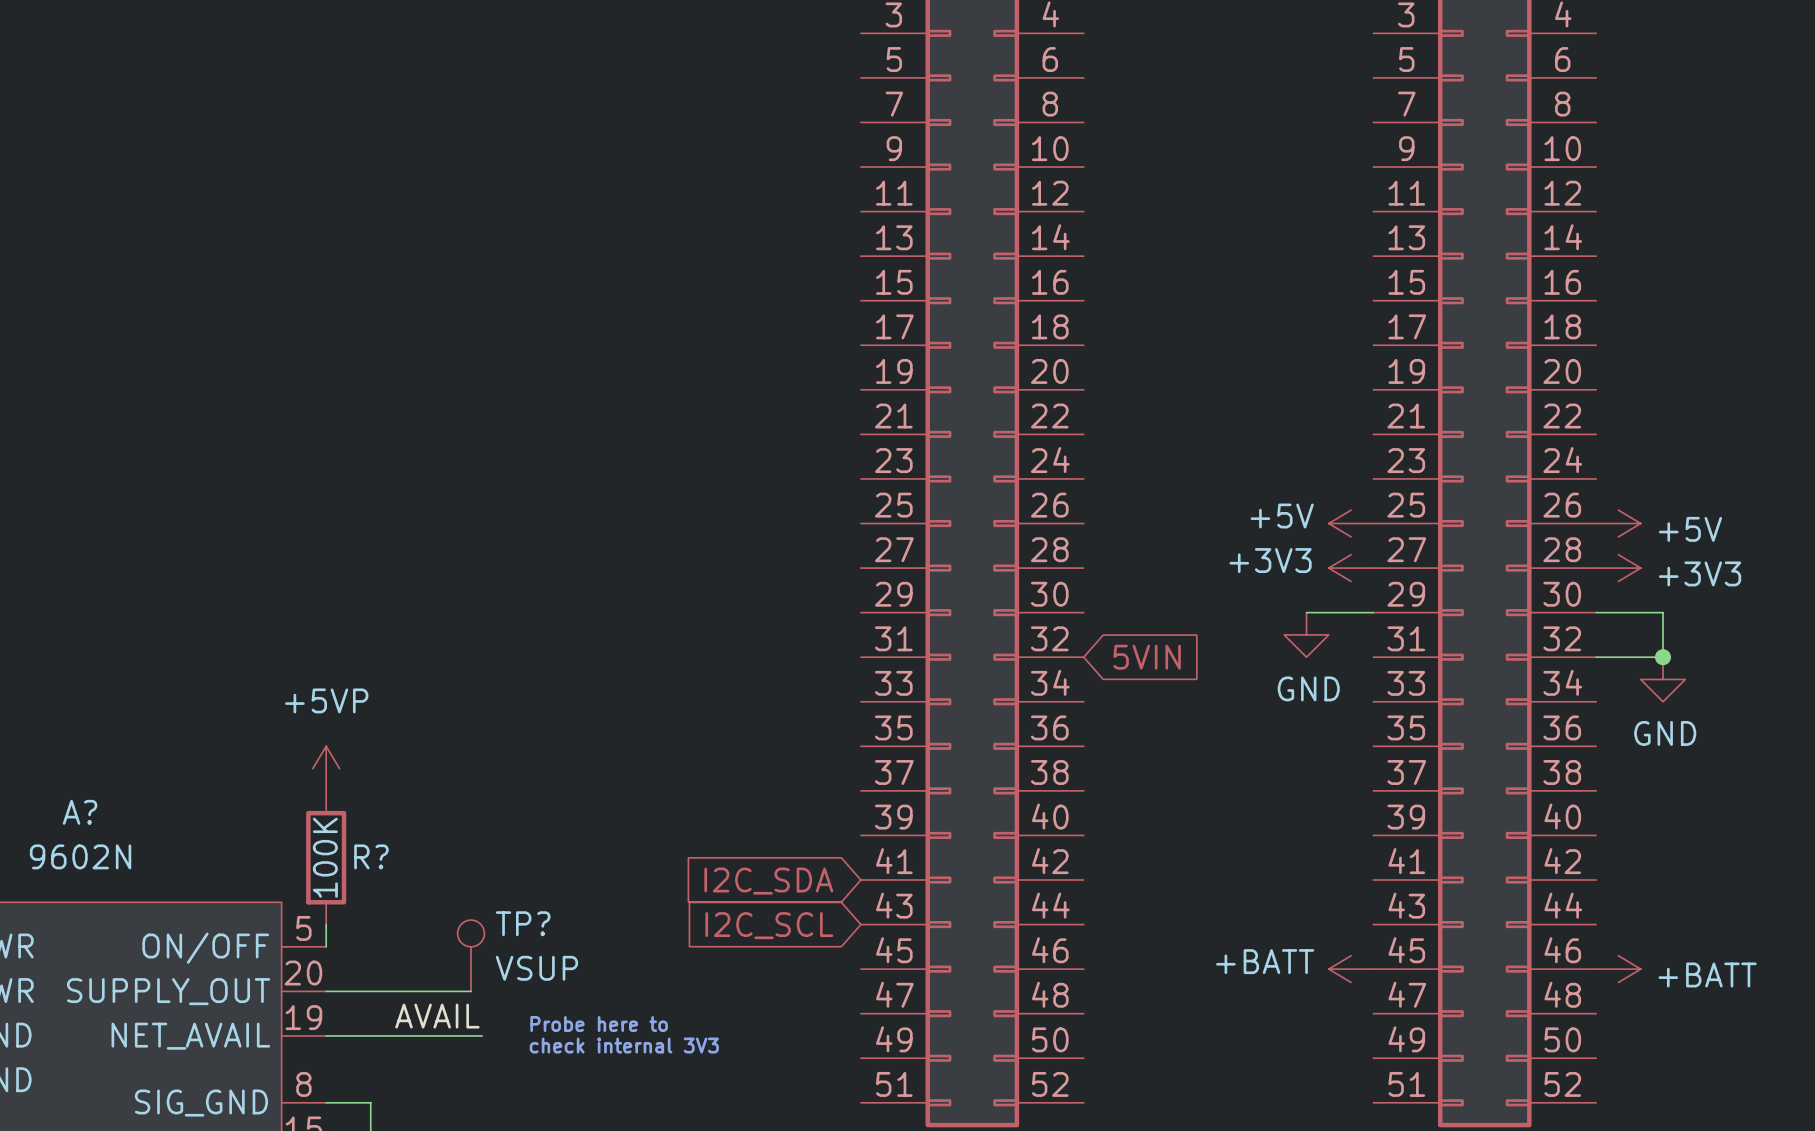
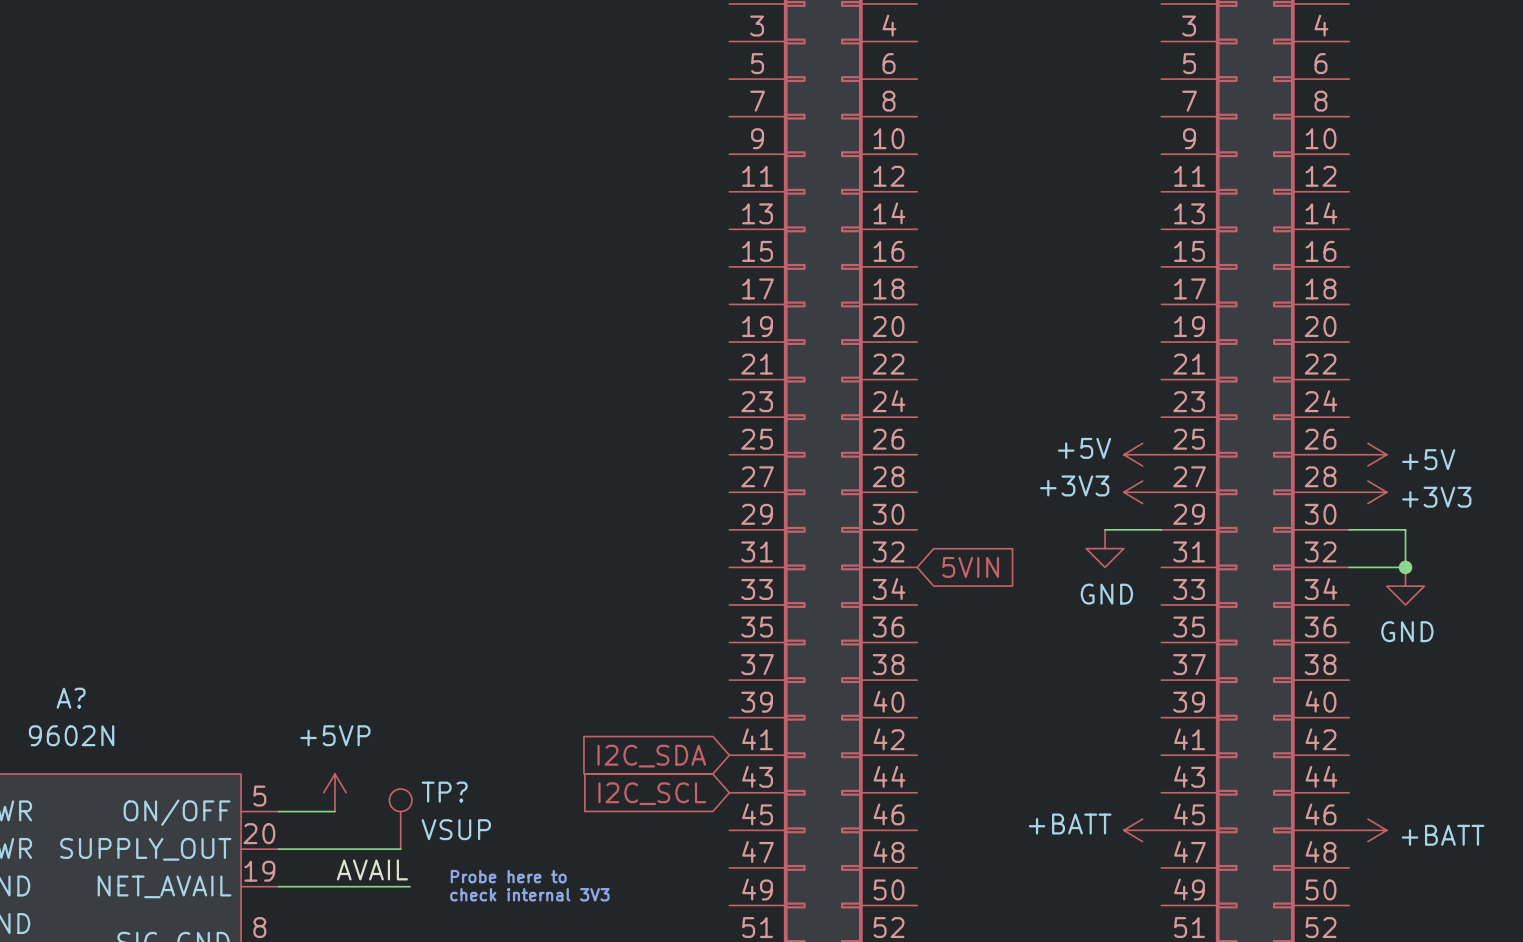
power symbol position: +5VP (326, 768) -> +5VP (334, 792)
R?: 100K (326, 857) -> none
wire: (326, 924) (326, 946) -> (334, 811) (278, 811)

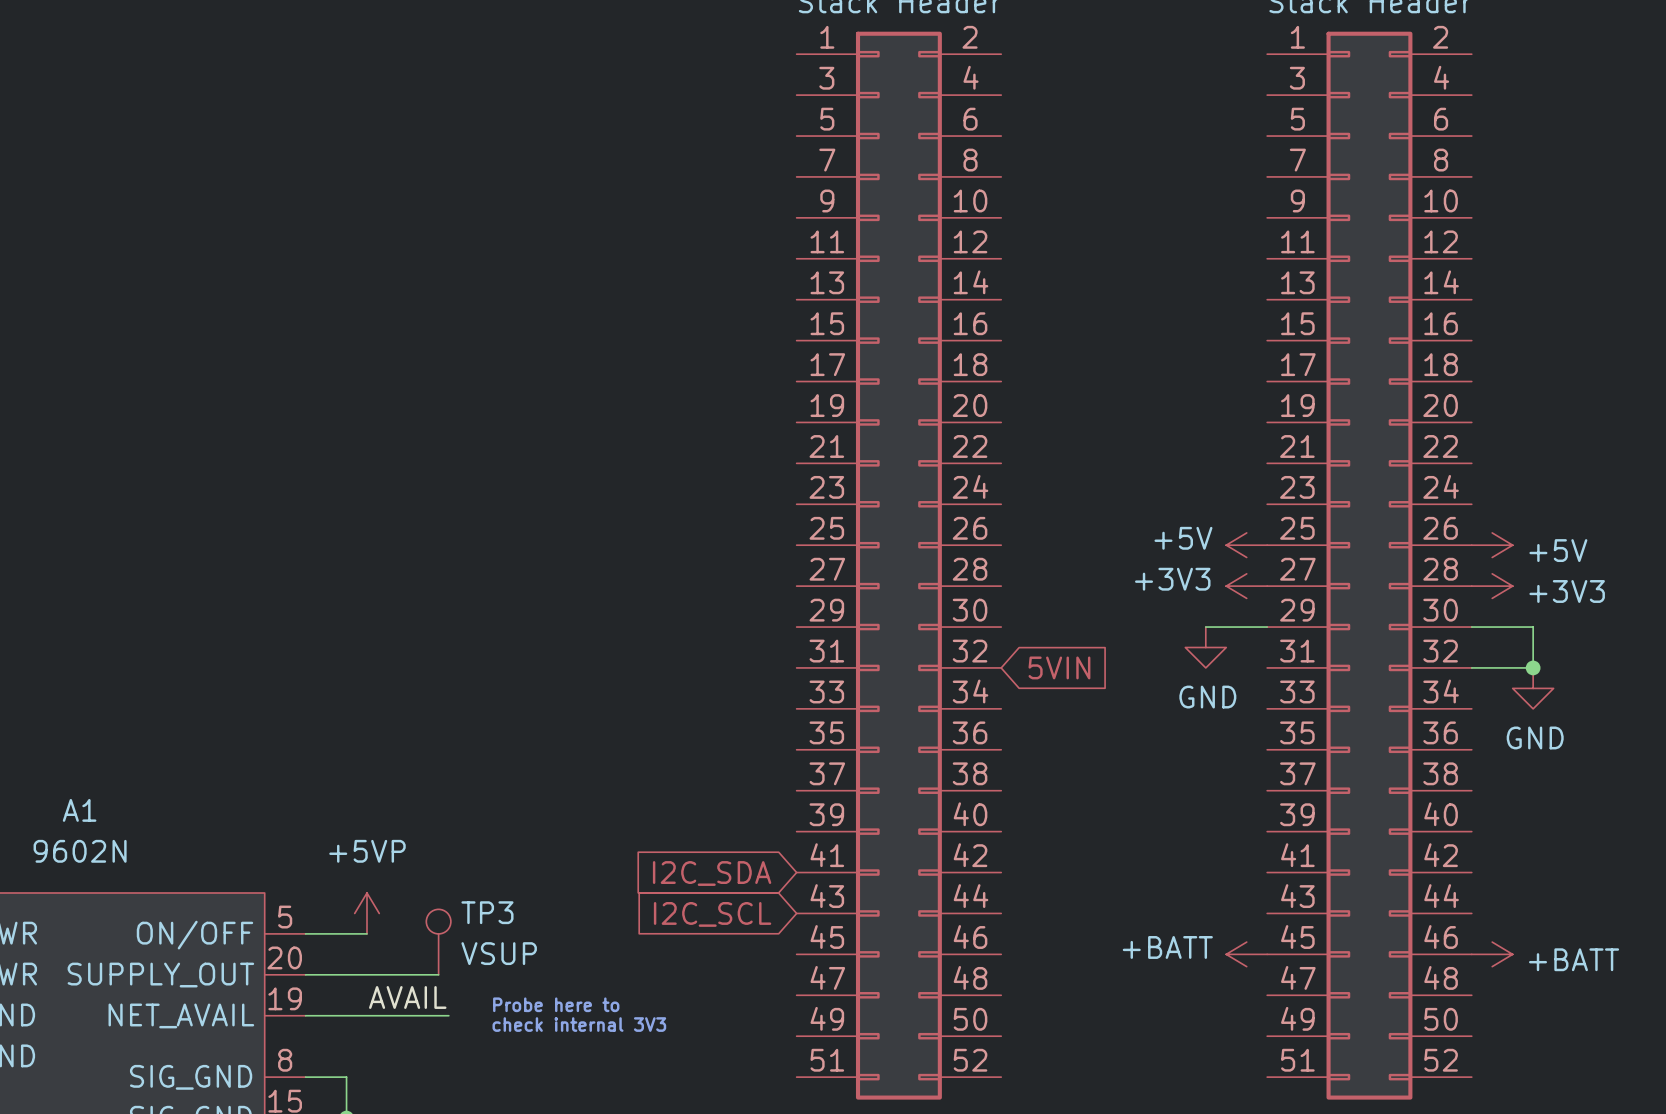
A? name: A? (71, 698) -> A1 (79, 810)
TP? name: TP? (444, 792) -> TP3 (487, 912)

